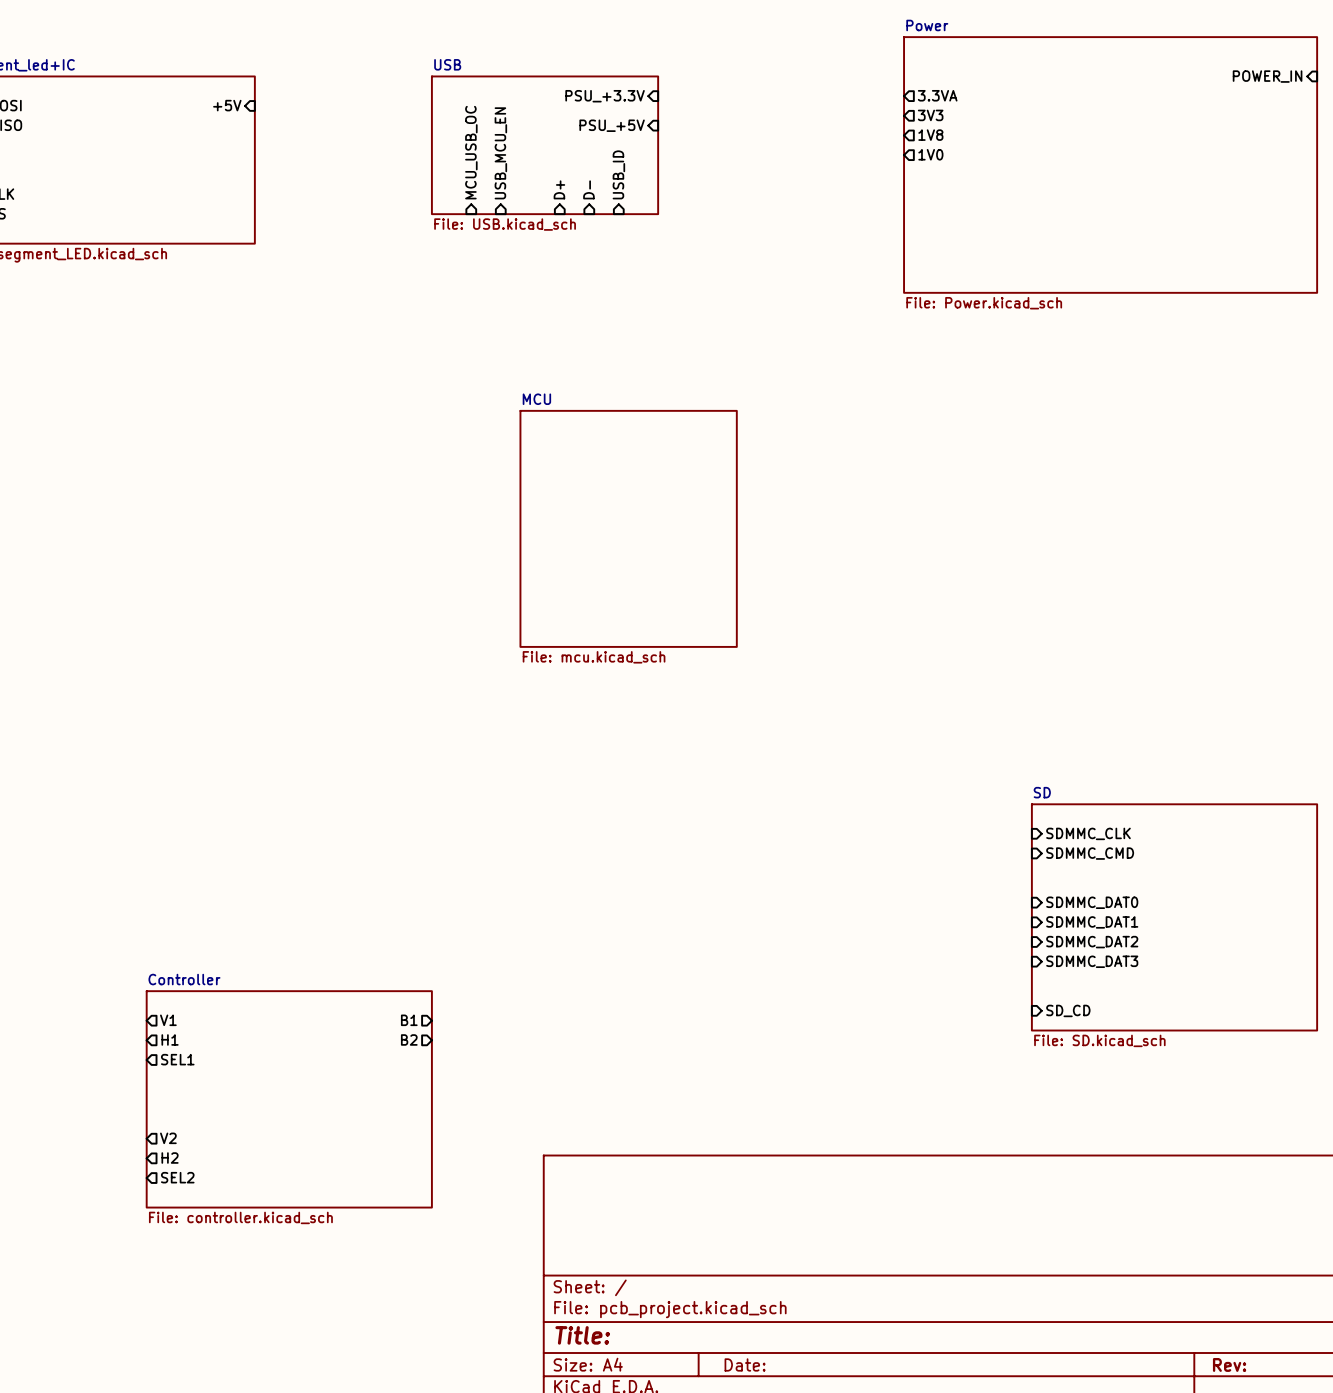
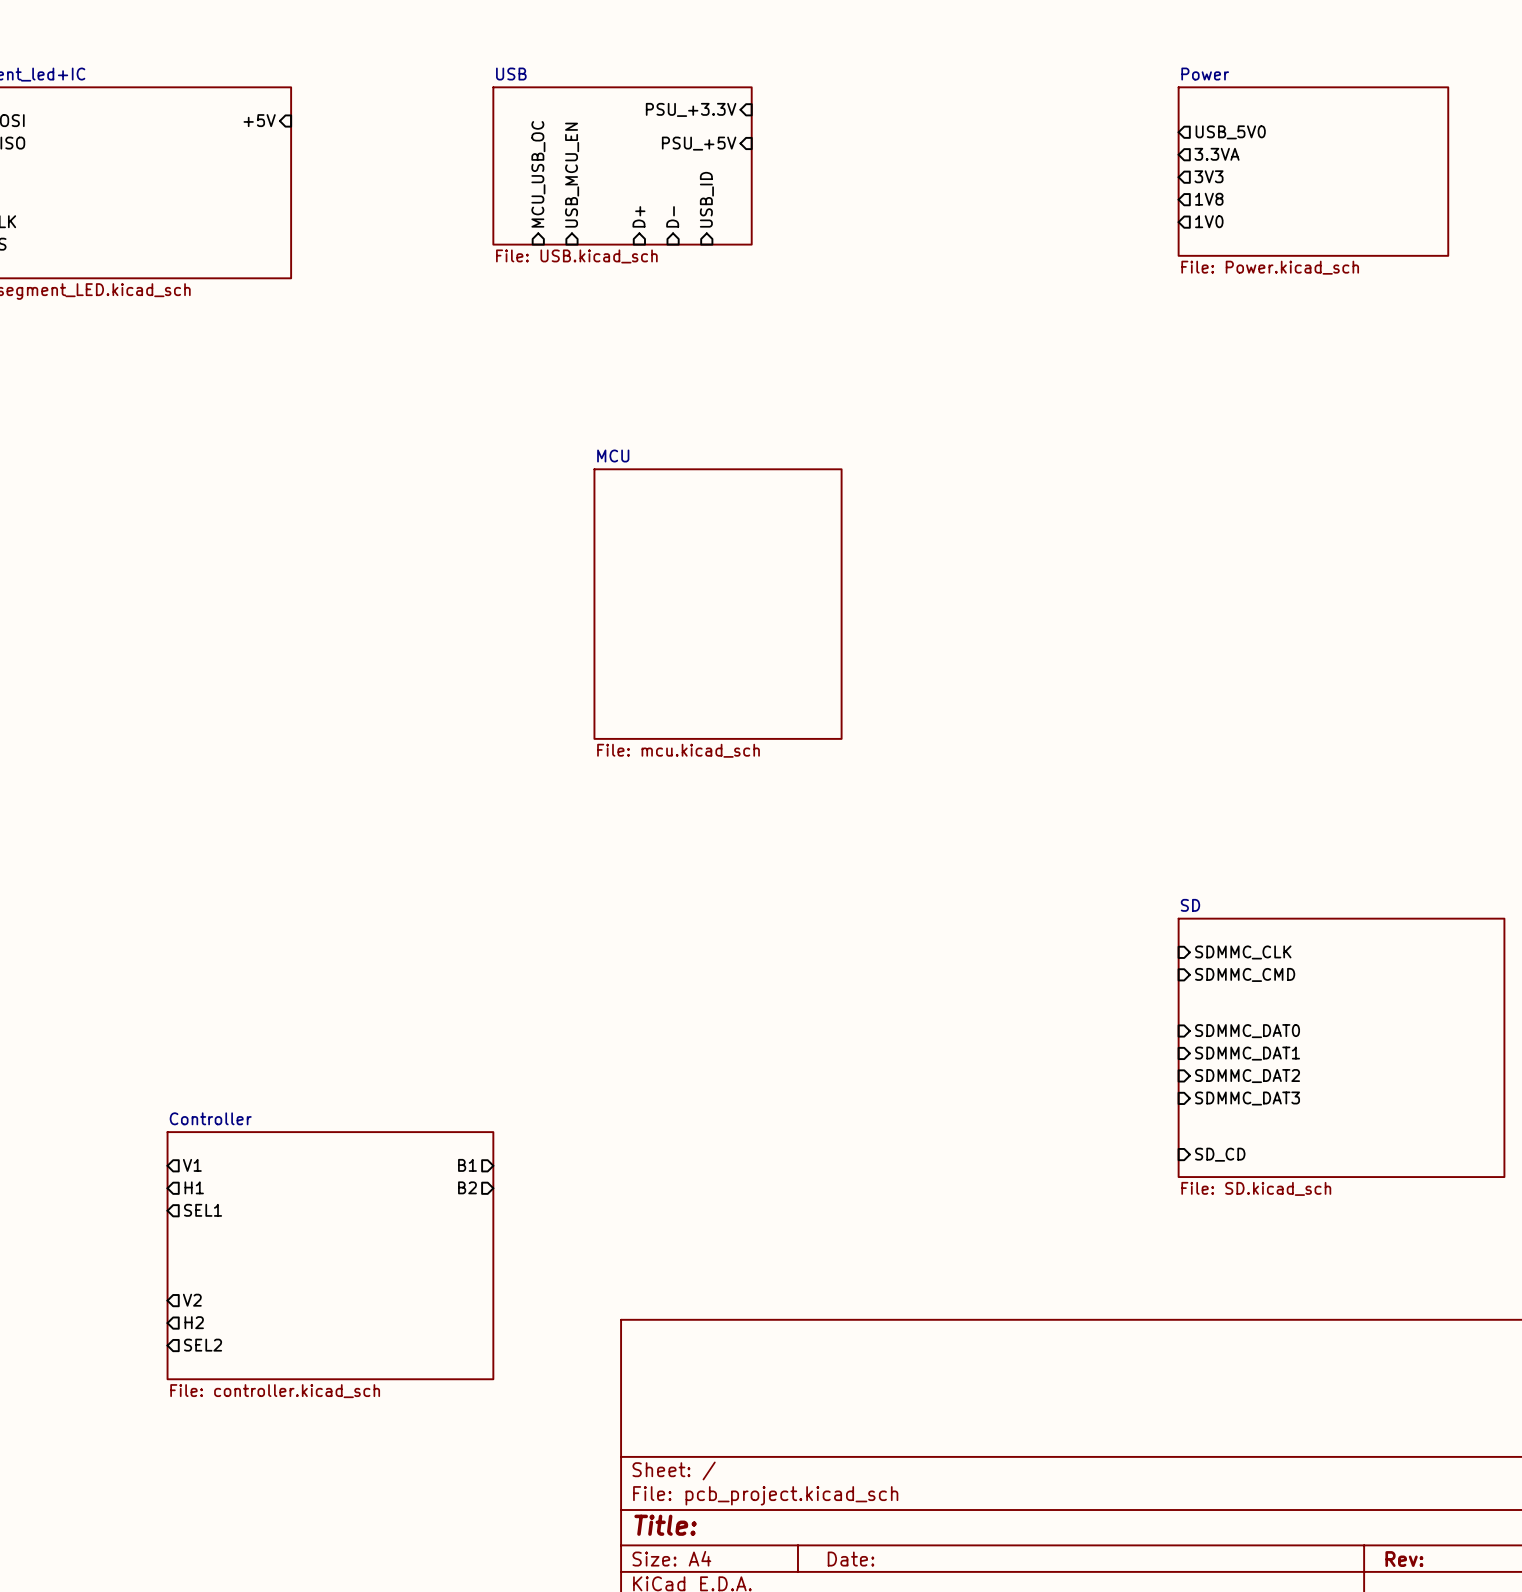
sheet pin: POWER_IN (1267, 76) -> none
sheet pin position: 3.3VA (937, 95) -> 3.3VA (1217, 154)
sheet pin position: 3V3 (930, 115) -> 3V3 (1209, 176)
sheet pin: none -> USB_5V0 (1230, 132)
sheet pin position: 1V8 (930, 135) -> 1V8 (1209, 199)
sheet Power: none -> File: Power.kicad_sch (1313, 171)
sheet pin position: 1V0 (930, 154) -> 1V0 (1209, 221)
sheet Power: File: Power.kicad_sch (1110, 164) -> none

